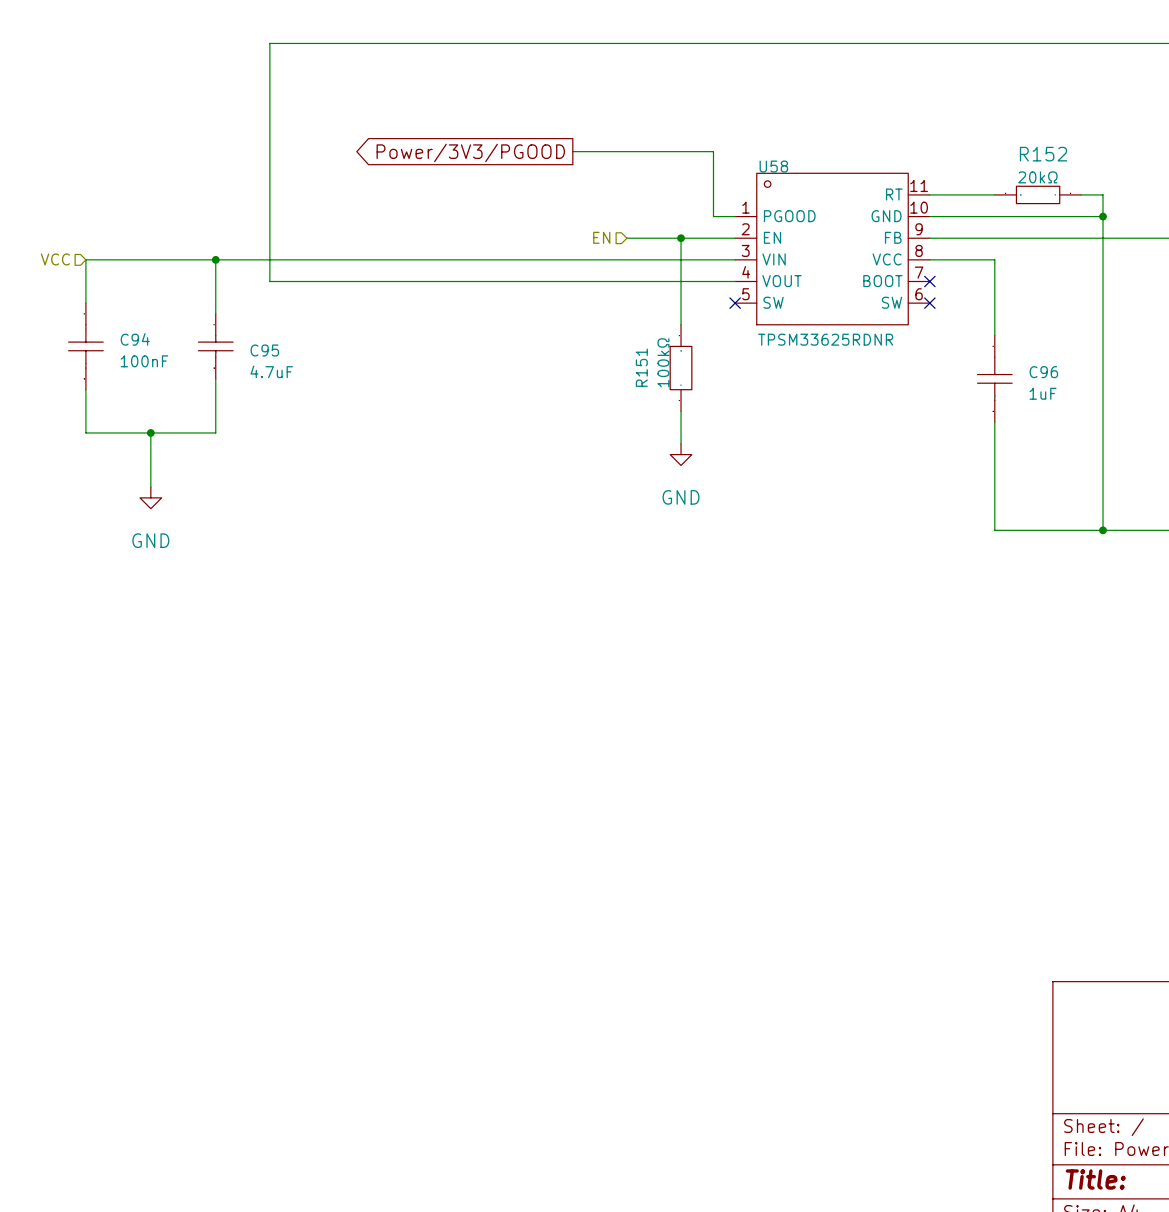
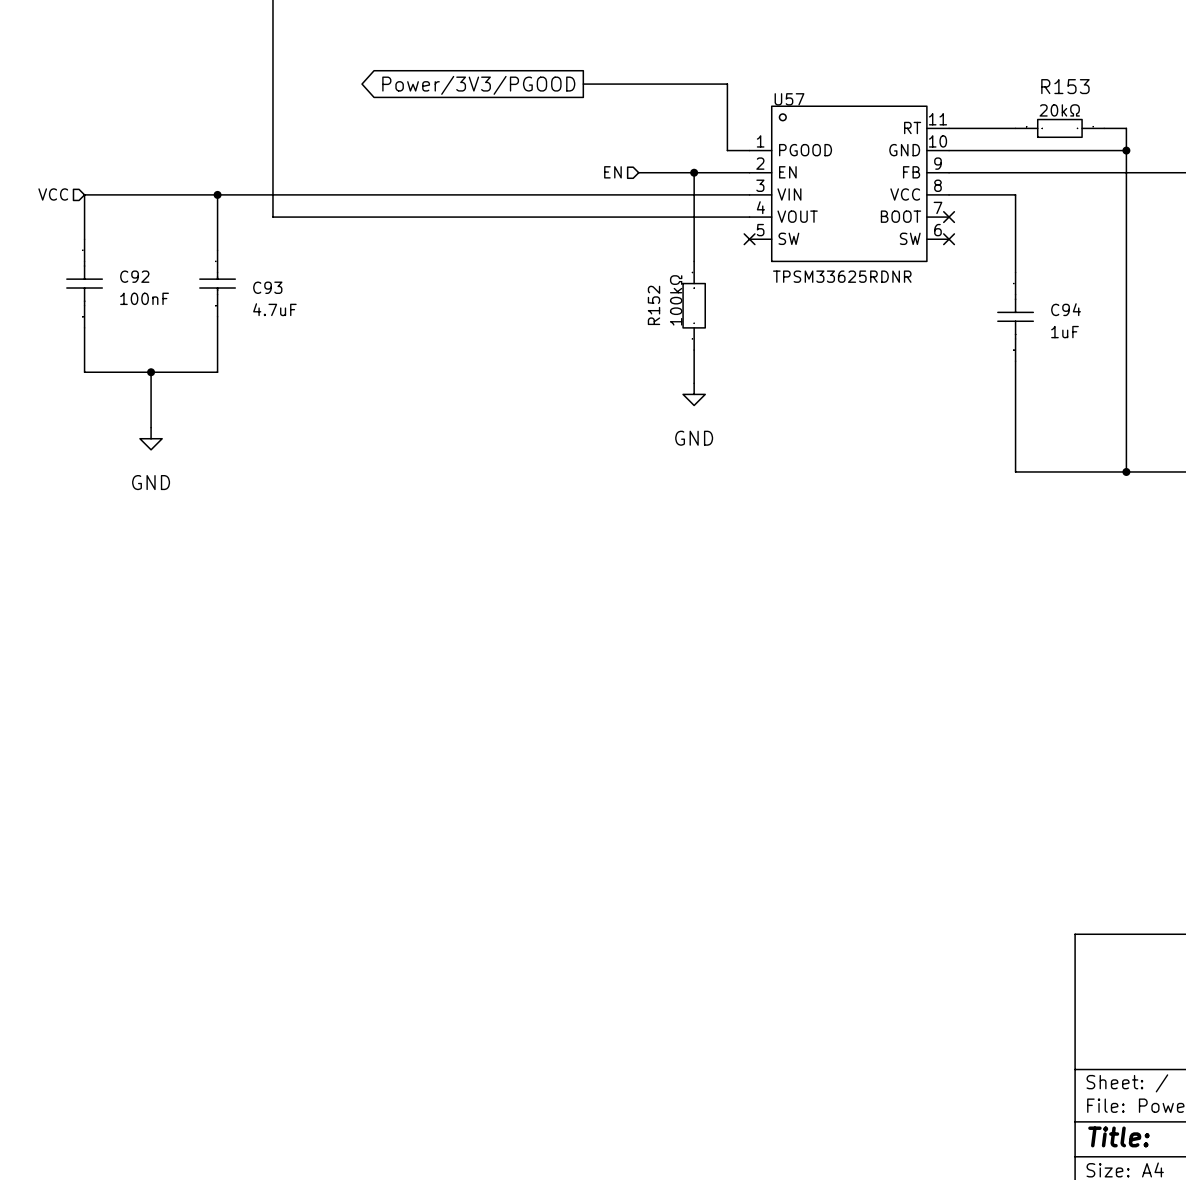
R152 name: R152 (1043, 154) -> R153 (1065, 86)
U58 name: U58 (773, 166) -> U57 (789, 99)
C94 name: C94 (135, 339) -> C92 (134, 276)
C95 name: C95 (264, 350) -> C93 (267, 287)
R151 name: R151 (641, 367) -> R152 (654, 305)
C96 name: C96 (1043, 372) -> C94 (1066, 309)

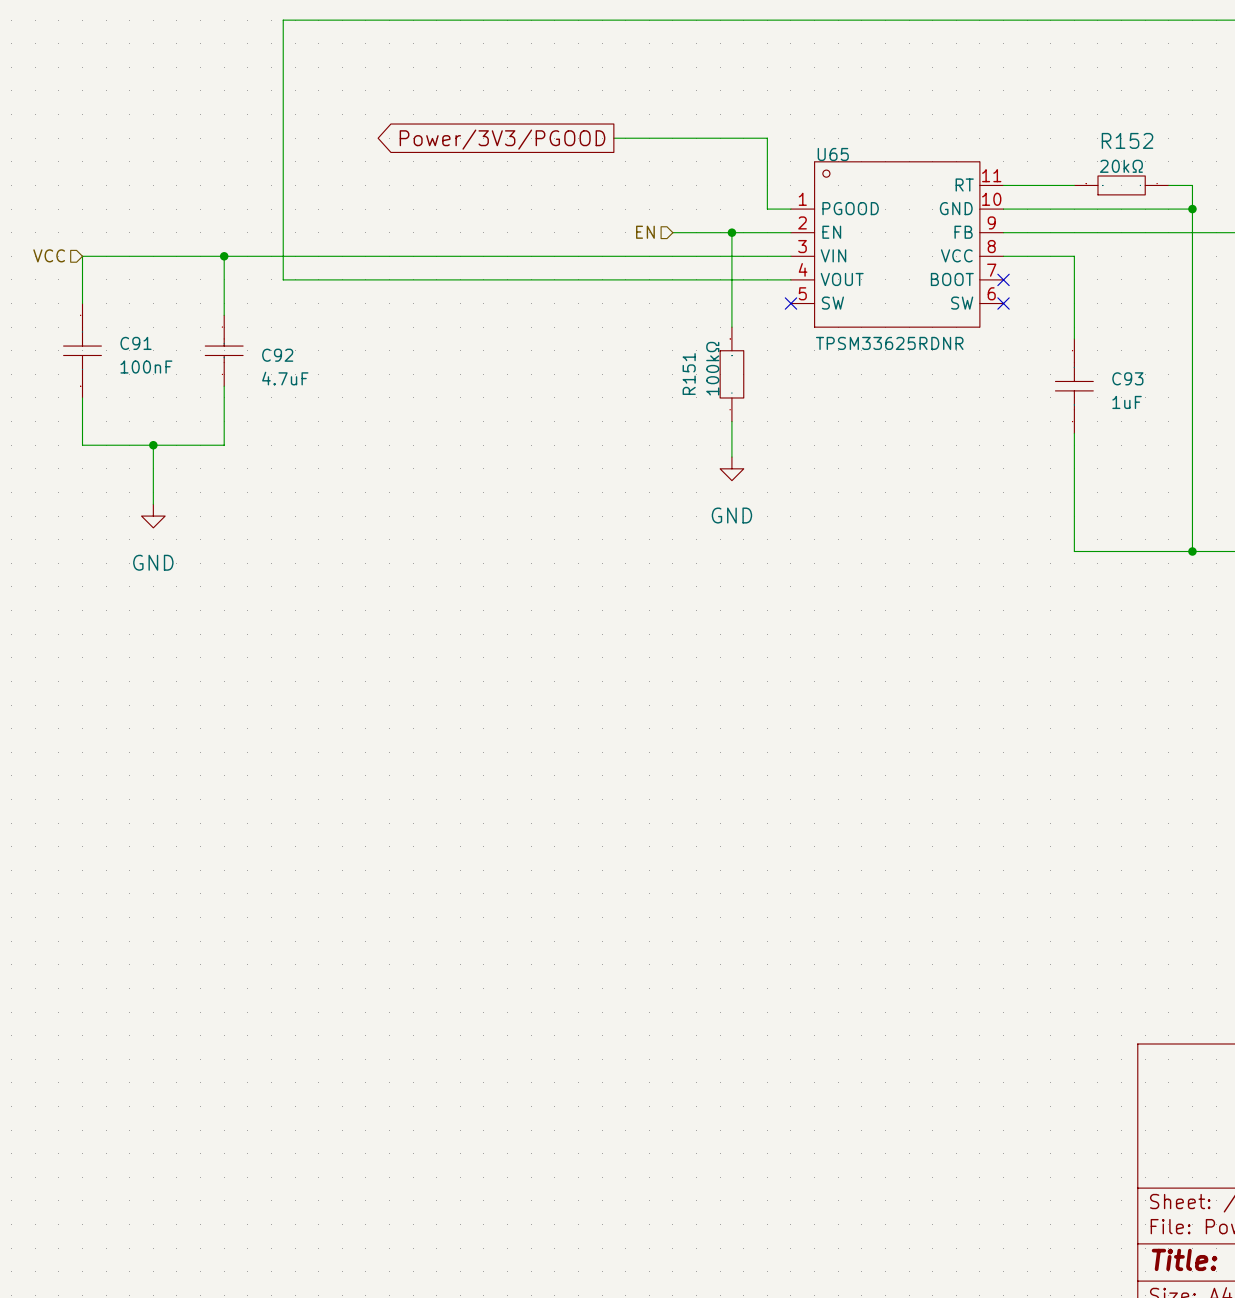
R153 name: R153 (1065, 86) -> R152 (1127, 140)
U57 name: U57 (789, 99) -> U65 (833, 154)
C92 name: C92 (134, 276) -> C91 (136, 343)
C93 name: C93 (267, 287) -> C92 (277, 355)
R152 name: R152 (654, 305) -> R151 (689, 374)
C94 name: C94 (1066, 309) -> C93 (1127, 378)

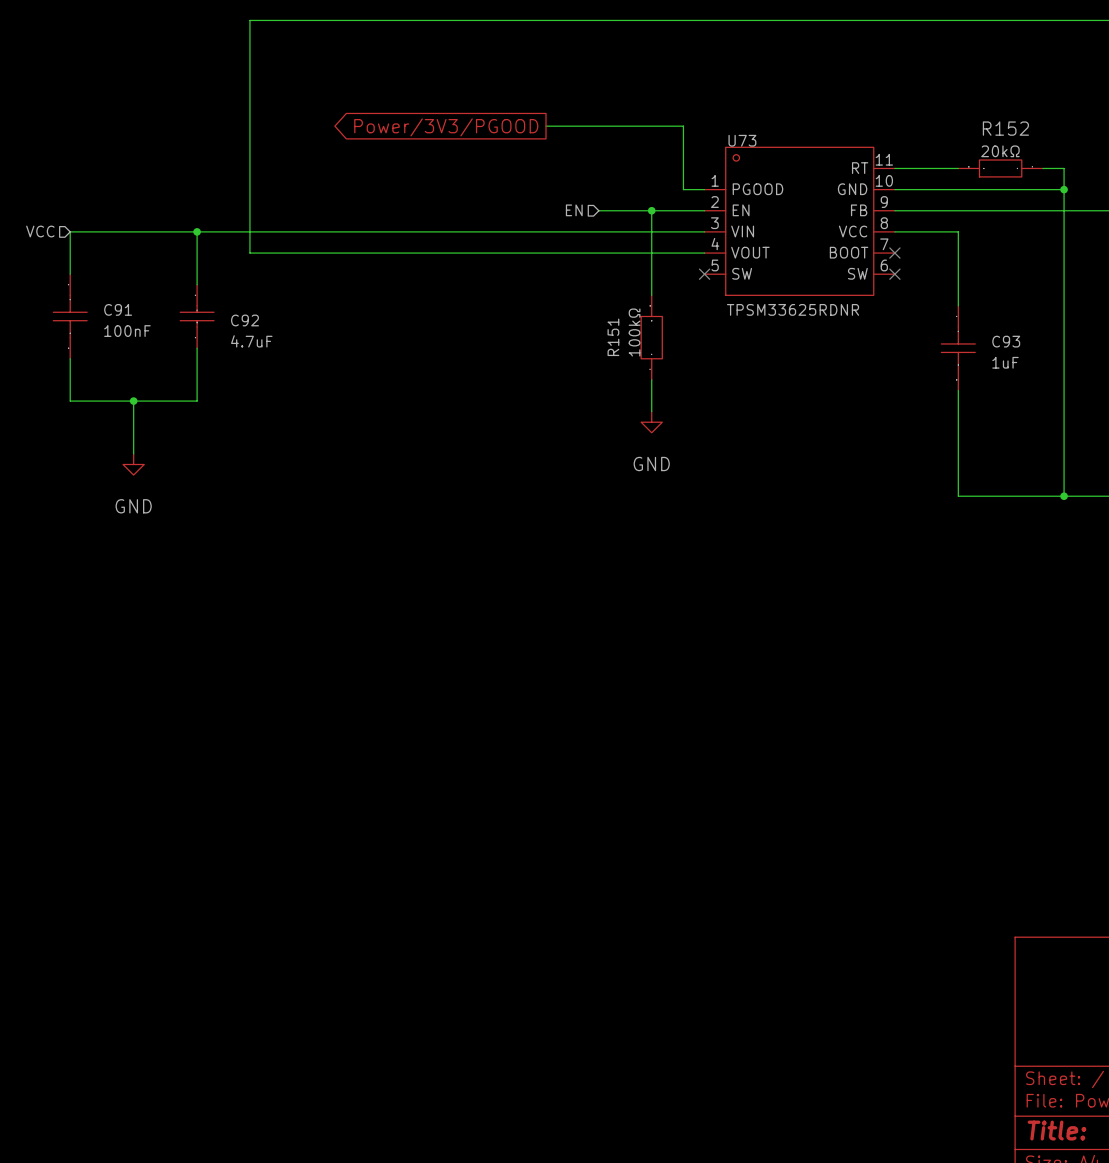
U65 name: U65 (833, 154) -> U73 (742, 140)

